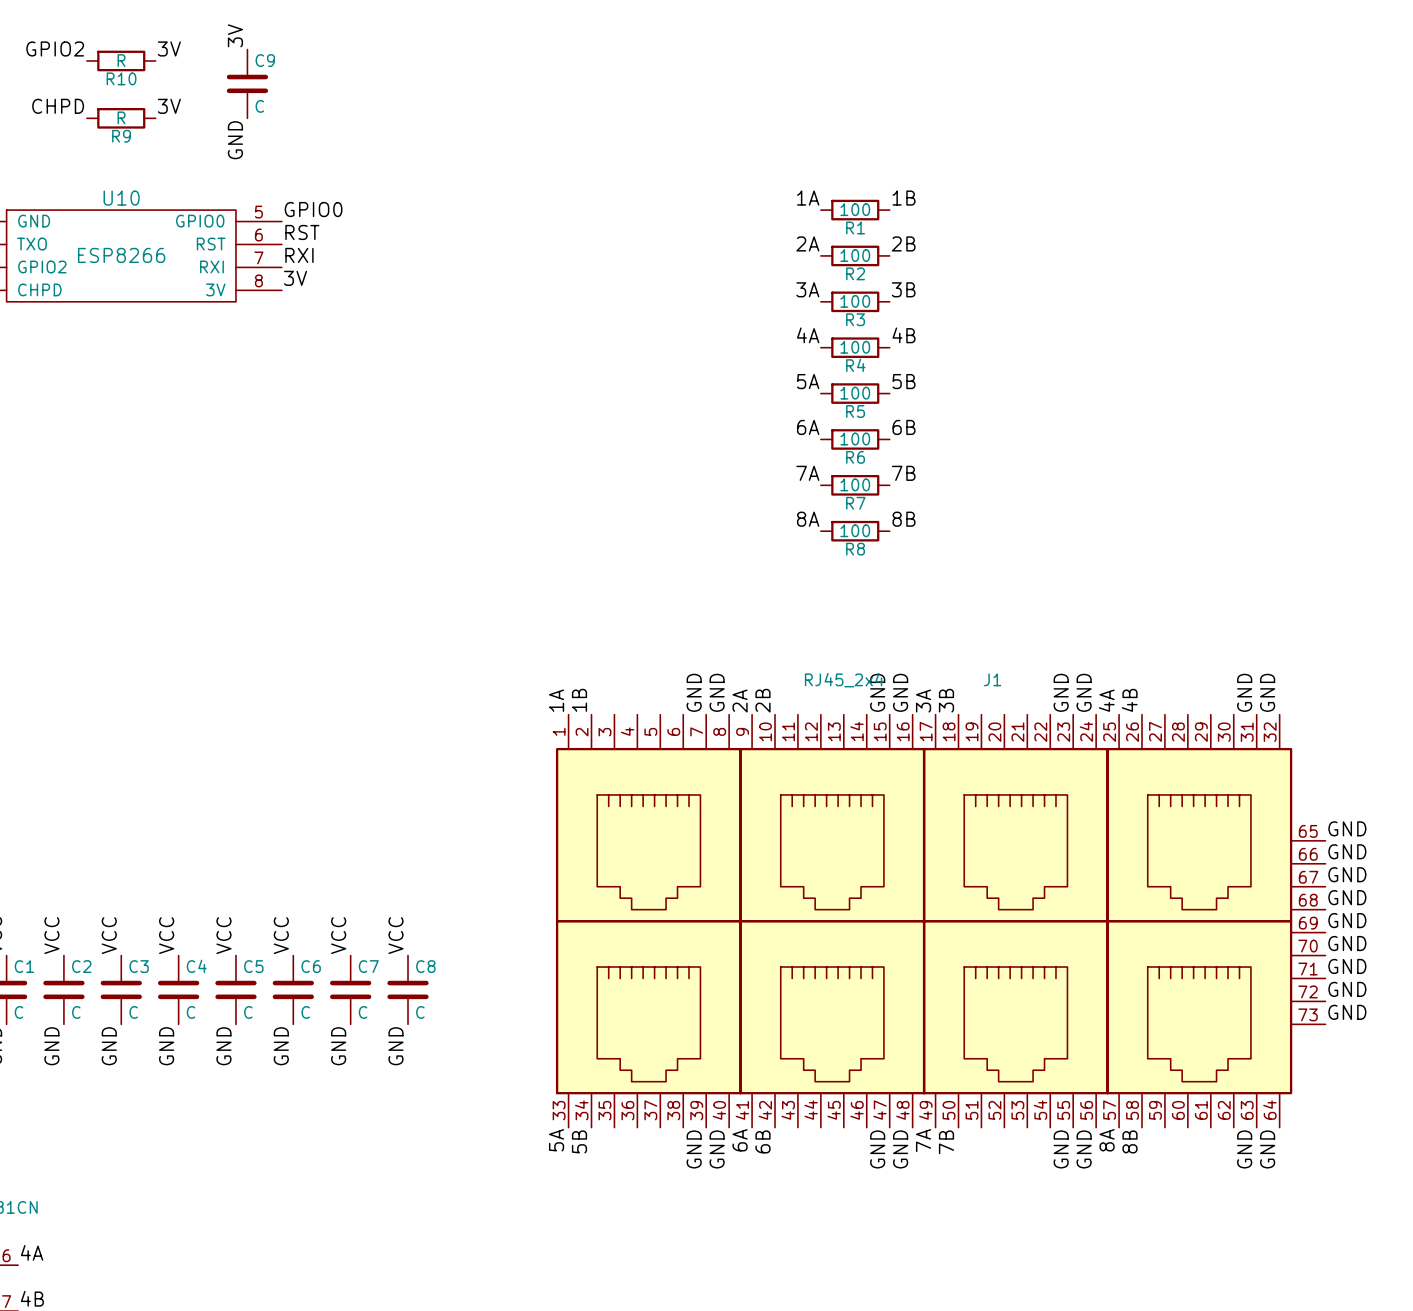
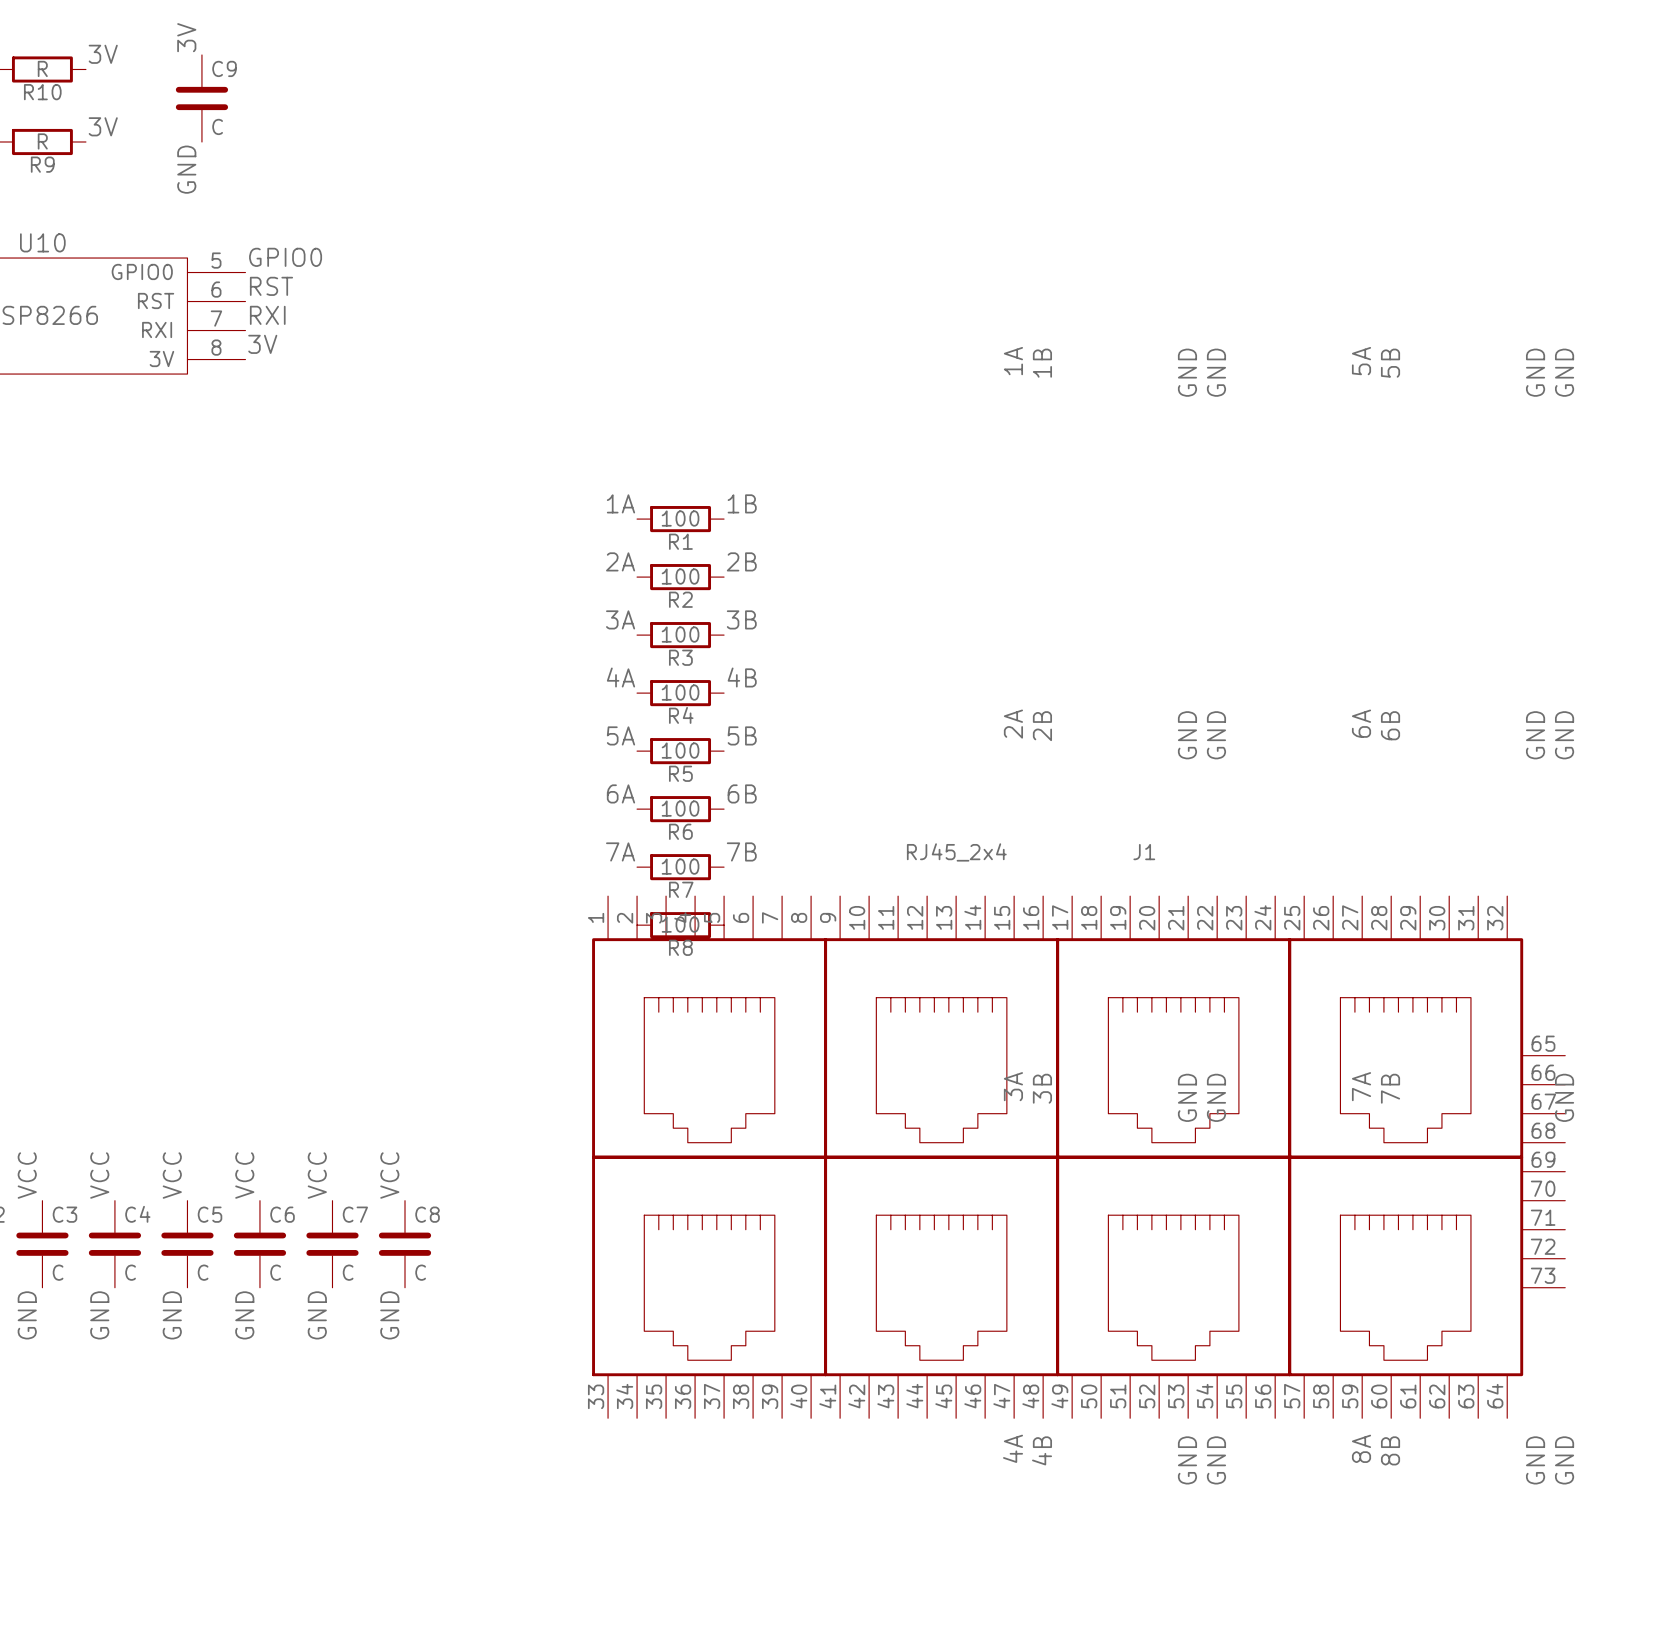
label rotation: 0° (808, 198) -> 90° counterclockwise (1013, 361)
label position: 1A (808, 198) -> 1A (1013, 361)
label rotation: 0° (904, 198) -> 90° counterclockwise (1042, 363)
label position: 1B (904, 198) -> 1B (1042, 363)
R1 position: (855, 210) -> (680, 519)
label: 2A (807, 243) -> none
label: 2B (903, 243) -> none
R2 position: (855, 255) -> (680, 577)
label: 3A (807, 289) -> none
label: 3B (903, 289) -> none
label: none -> 5A (1361, 361)
label: none -> 5B (1390, 363)
label: none -> GND (1187, 372)
label: none -> GND (1216, 372)
label: none -> GND (1535, 372)
label: none -> GND (1564, 372)
R3 position: (855, 301) -> (680, 635)
label: 4A (808, 335) -> none
label: 4B (904, 335) -> none
R4 position: (855, 347) -> (680, 693)
label: 5A (808, 381) -> none
label: 5B (904, 381) -> none
R5 position: (855, 393) -> (680, 751)
label: none -> 1A (620, 503)
label: none -> 1B (742, 503)
label: 6A (808, 427) -> none
label: 6B (904, 427) -> none
R6 position: (855, 439) -> (680, 809)
label: none -> 2A (620, 561)
label: none -> 2B (741, 561)
label: 7A (807, 473) -> none
label: 7B (903, 473) -> none
R7 position: (855, 485) -> (680, 867)
label: none -> 3A (620, 619)
label: none -> 3B (741, 619)
label: 8A (808, 519) -> none
label: 8B (904, 519) -> none
R8 position: (855, 531) -> (680, 925)
label: none -> 4A (620, 677)
label: none -> 4B (742, 677)
label: none -> 2A (1013, 724)
label: none -> 6A (1361, 723)
label: none -> 6B (1390, 725)
label: none -> 2B (1042, 726)
label: none -> GND (1187, 735)
label: none -> GND (1216, 735)
label: none -> GND (1535, 735)
label: none -> GND (1564, 735)
label: none -> 5A (620, 735)
label: none -> 5B (742, 735)
label: none -> 6A (620, 793)
label: none -> 6B (742, 793)
label: none -> 7A (620, 851)
label: none -> 7B (741, 851)
label: GND (694, 692) -> none
label: GND (717, 692) -> none
label: GND (877, 692) -> none
label: GND (900, 692) -> none
label: GND (1061, 692) -> none
label: GND (1084, 692) -> none
label: GND (1244, 692) -> none
label: GND (1267, 692) -> none
label: 1A (556, 700) -> none
label: 1B (579, 700) -> none
label: 2B (762, 700) -> none
label position: 3B (946, 700) -> 3B (1042, 1088)
label: 4A (1106, 700) -> none
label: 4B (1129, 700) -> none
label: 2A (740, 701) -> none
label position: 3A (923, 701) -> 3A (1013, 1086)
label: GND (1347, 828) -> none
label rotation: 0° (1347, 851) -> 90° counterclockwise (1564, 1097)
label: none -> 7A (1361, 1086)
label: none -> 7B (1390, 1088)
label: none -> GND (1187, 1097)
label: none -> GND (1216, 1097)
label: GND (1347, 874) -> none
label: GND (1347, 897) -> none
label: GND (1347, 920) -> none
label: GND (1347, 943) -> none
label: GND (1347, 966) -> none
label: GND (1347, 989) -> none
label: GND (1347, 1012) -> none
label: 5A (556, 1140) -> none
label: 6A (740, 1140) -> none
label: 7A (923, 1140) -> none
label position: 8A (1107, 1140) -> 8A (1361, 1448)
label: 5B (579, 1141) -> none
label: 6B (762, 1141) -> none
label position: 8B (1129, 1141) -> 8B (1390, 1450)
label: 7B (946, 1142) -> none
label: GND (694, 1149) -> none
label: GND (717, 1149) -> none
label: GND (877, 1149) -> none
label: GND (900, 1149) -> none
label position: GND (1061, 1149) -> GND (1216, 1460)
label: GND (1084, 1149) -> none
label: GND (1244, 1149) -> none
label: GND (1267, 1149) -> none
label: none -> 4A (1013, 1448)
label: none -> 4B (1042, 1450)
label: none -> GND (1187, 1460)
label: none -> GND (1535, 1460)
label: none -> GND (1564, 1460)

